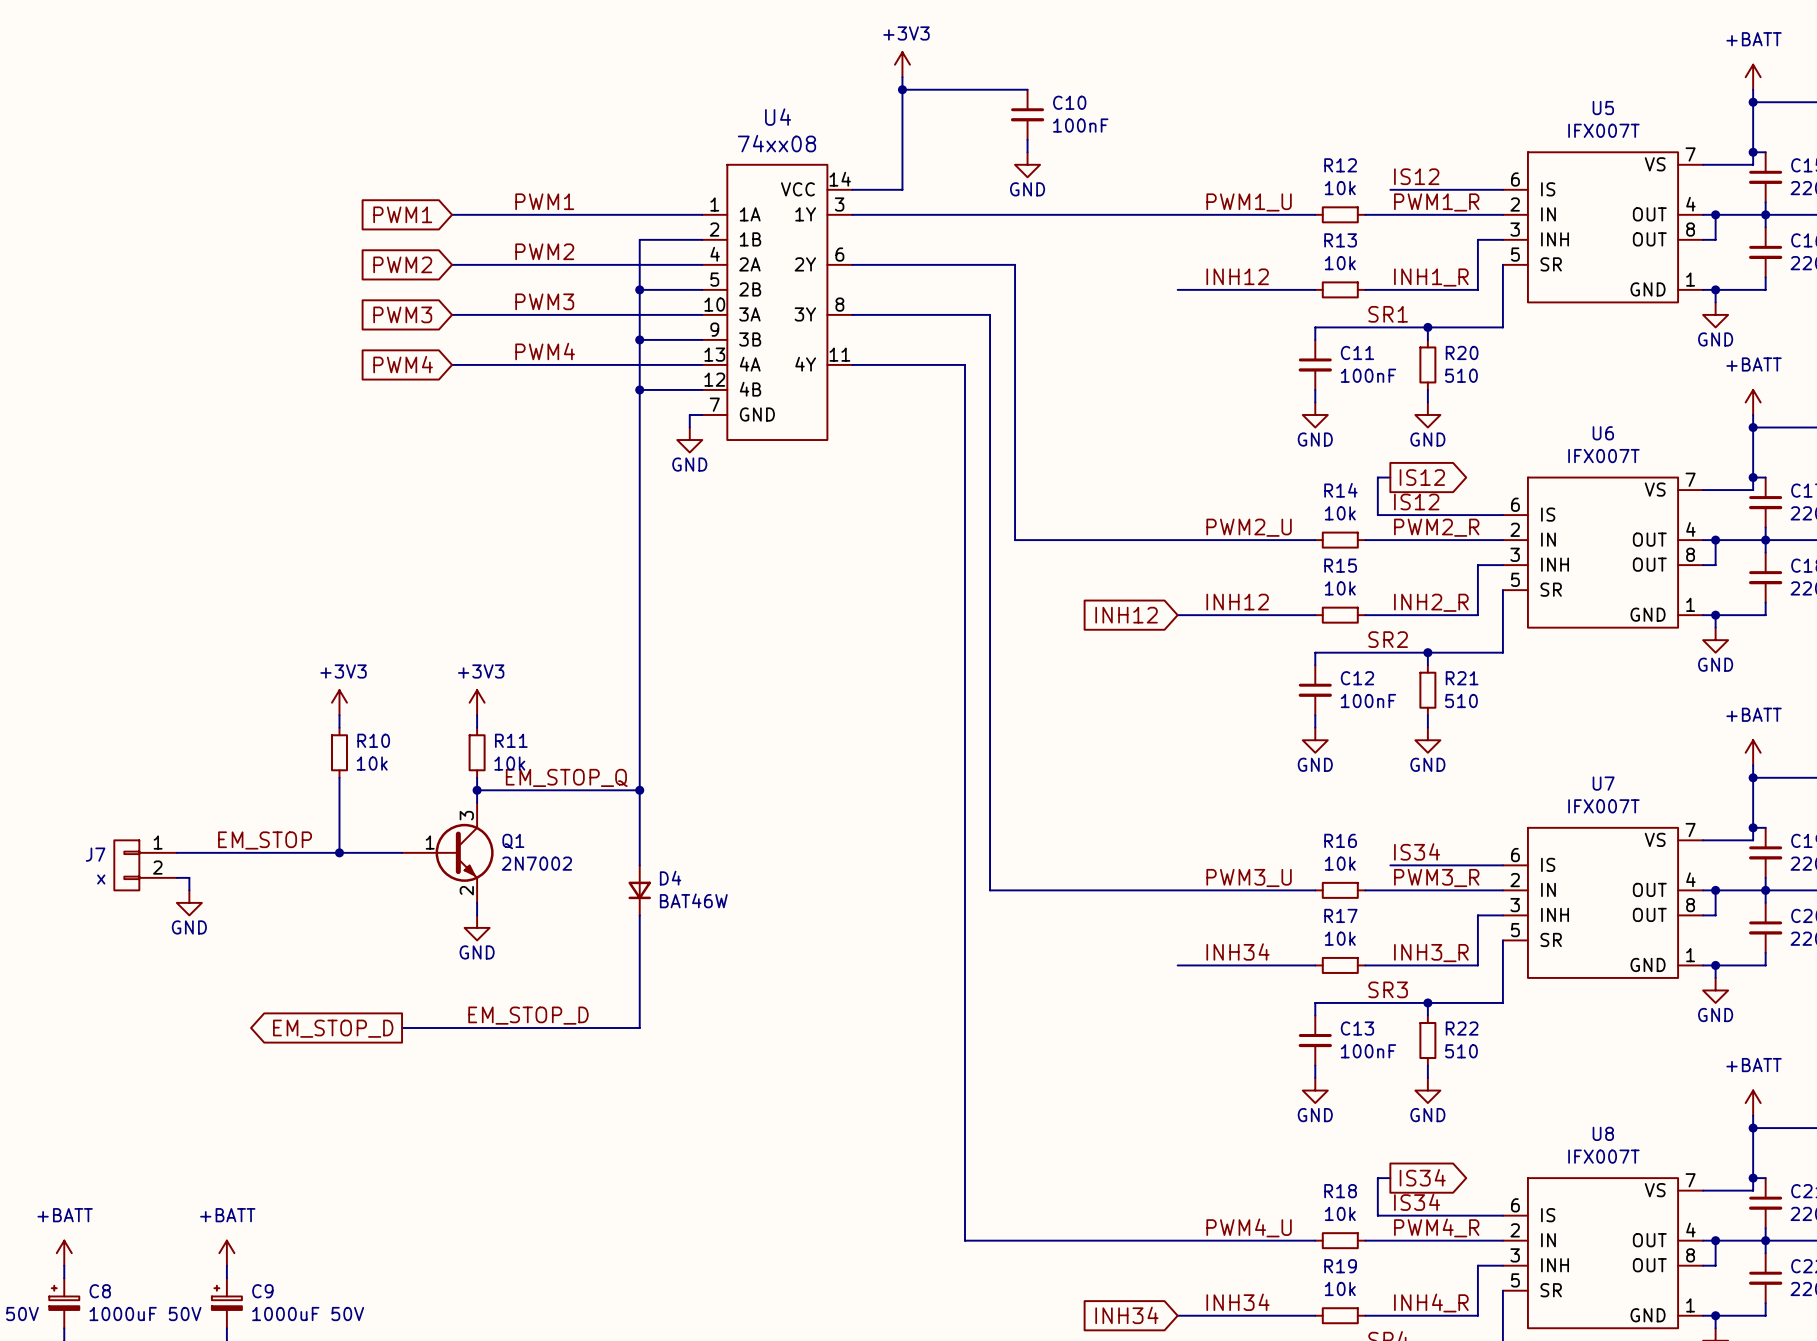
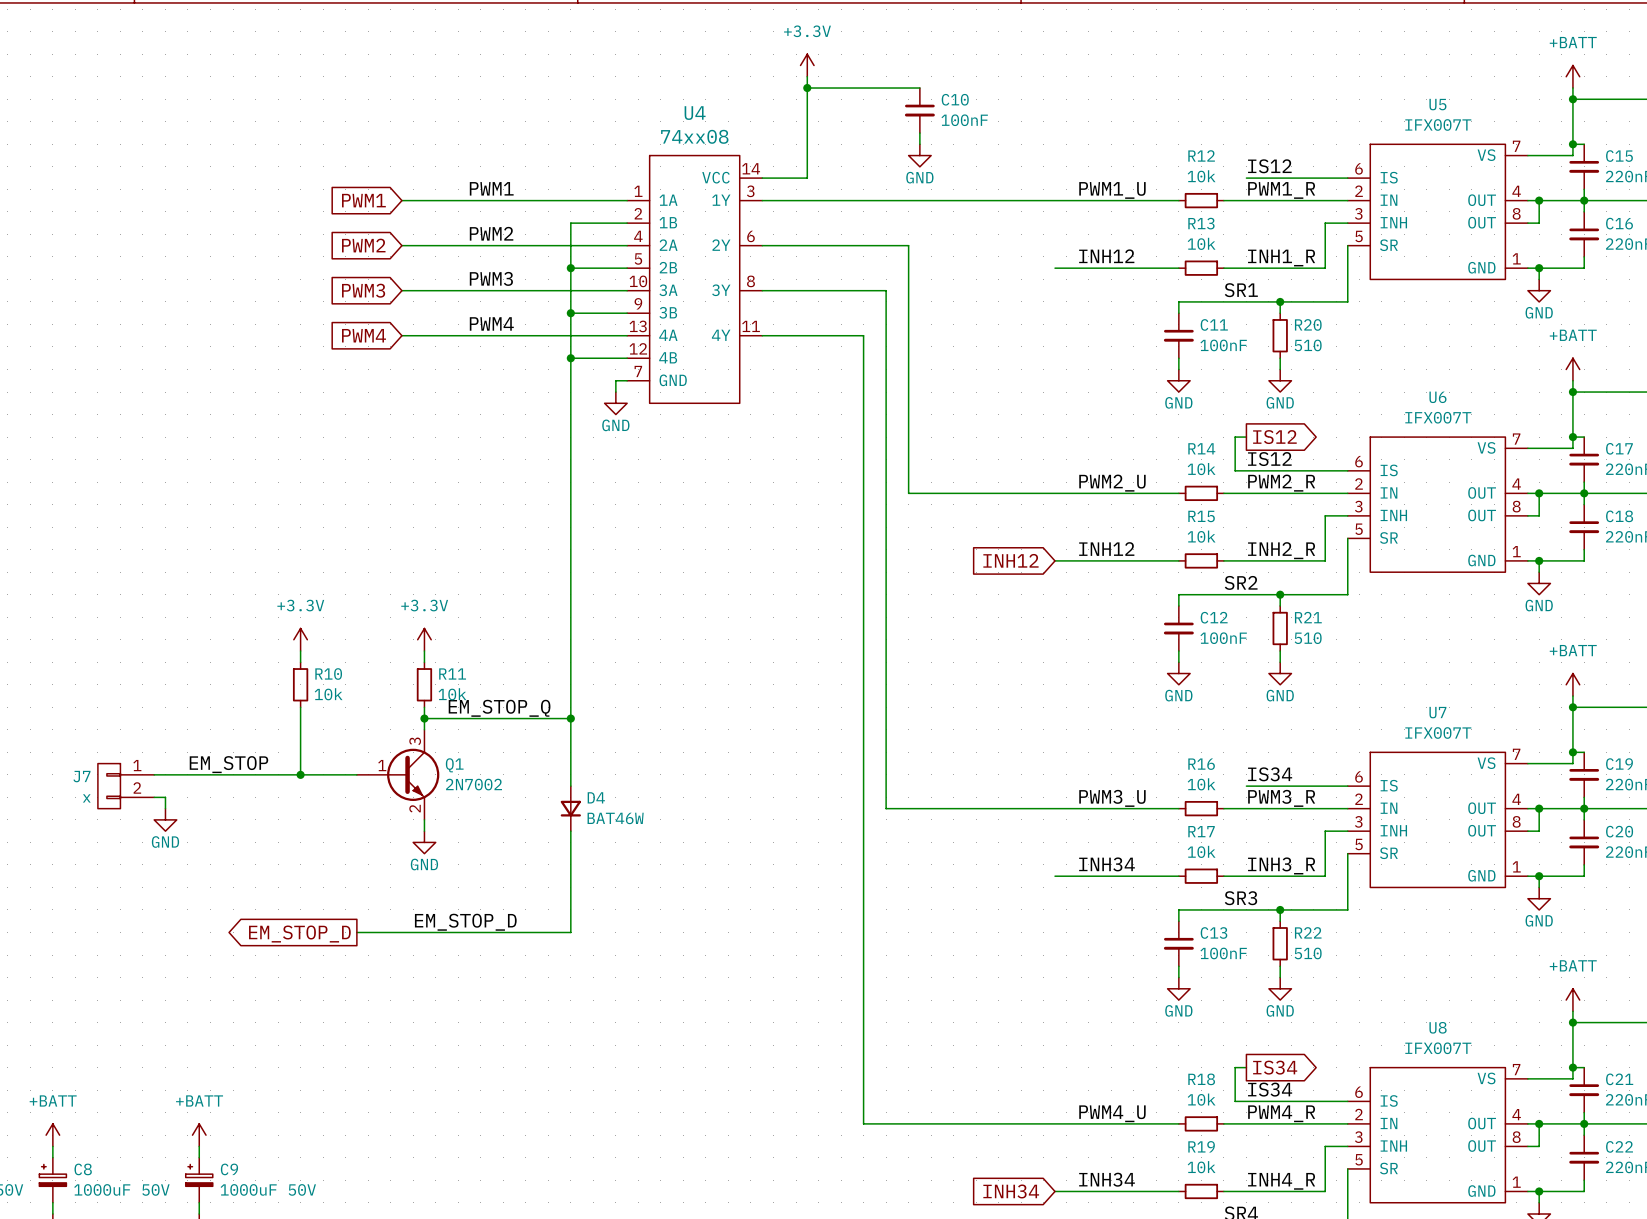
power symbol: +3V3 (902, 64) -> +3.3V (807, 65)
power symbol: +3V3 (339, 702) -> +3.3V (300, 639)
power symbol: +3V3 (477, 702) -> +3.3V (424, 639)

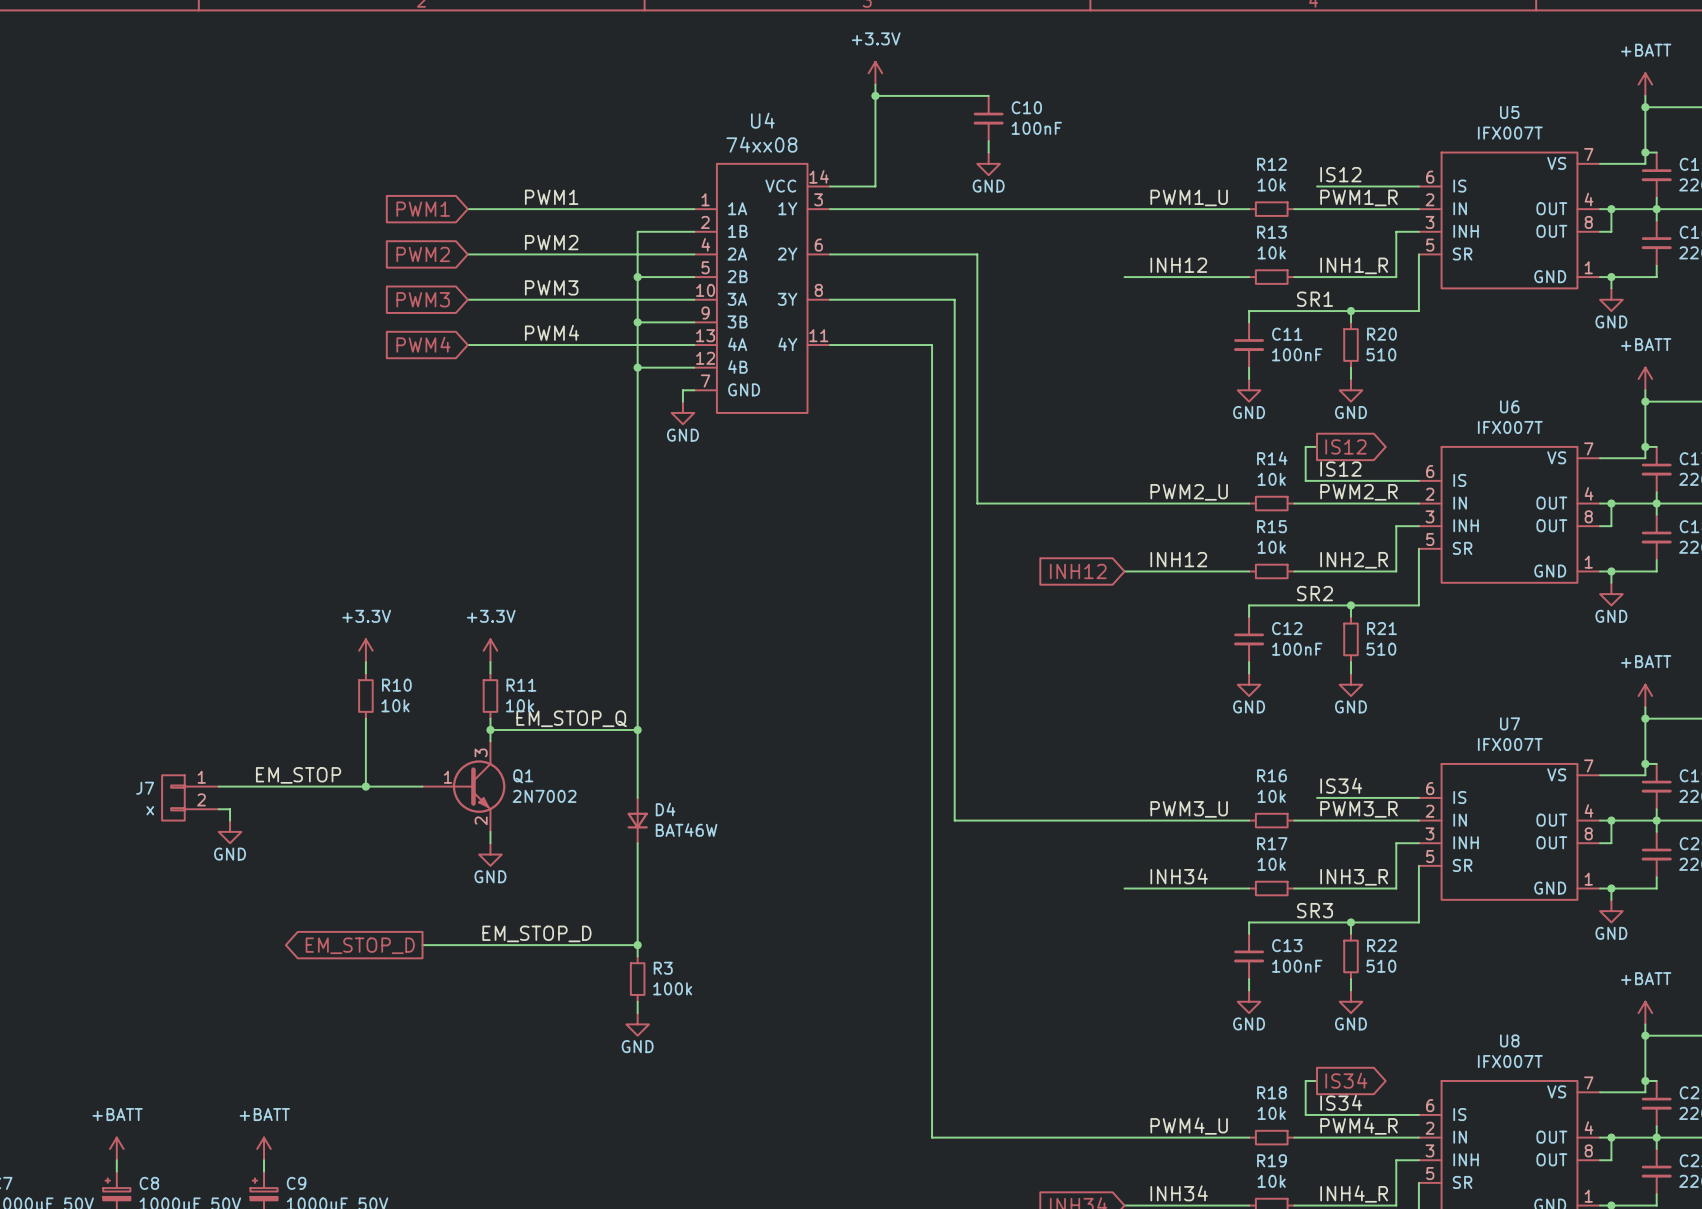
wire: none -> (637, 945) (637, 956)
junction: none -> (637, 945)
R3: none -> 100k (637, 979)
wire: none -> (637, 1001) (637, 1013)
power symbol: none -> GND (637, 1024)

